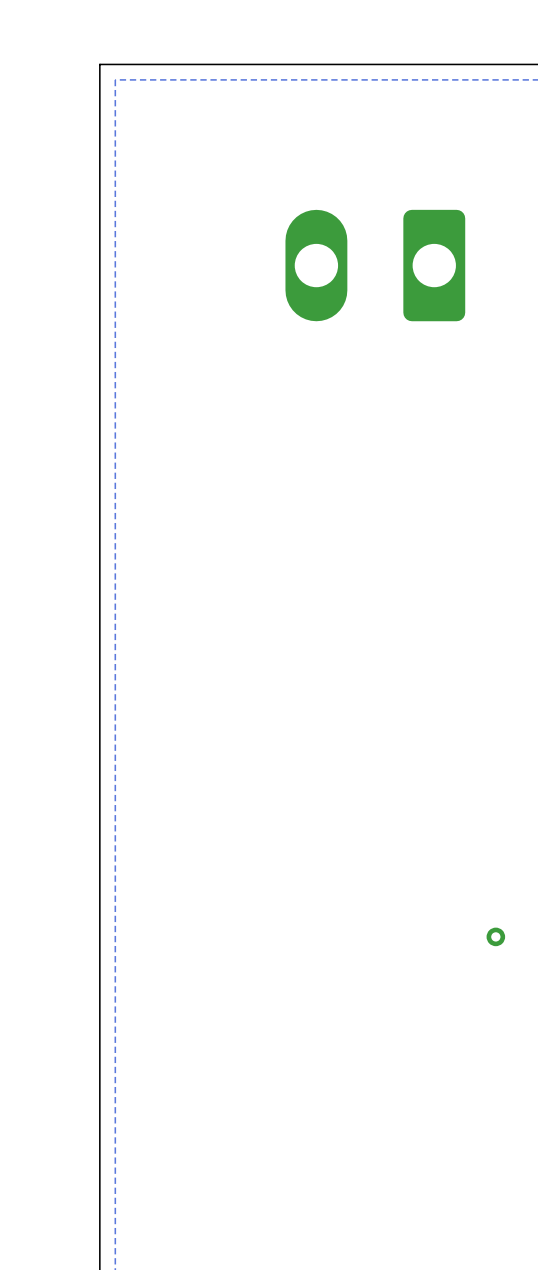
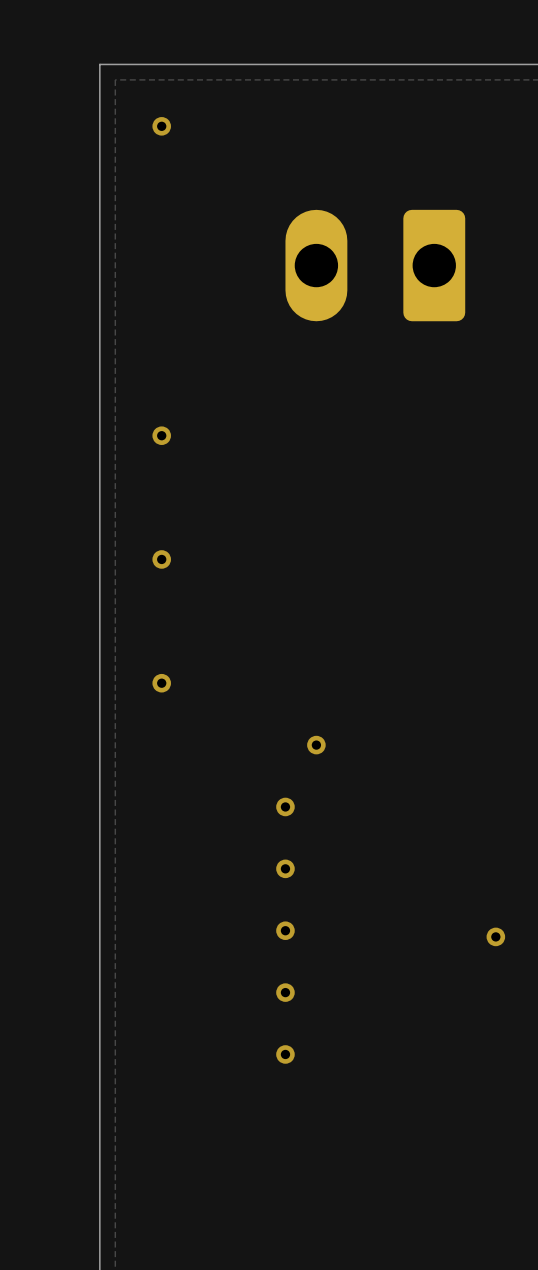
via: none -> (161, 126)
via: none -> (161, 435)
via: none -> (161, 559)
via: none -> (161, 683)
via: none -> (316, 745)
via: none -> (285, 806)
via: none -> (285, 868)
via: none -> (285, 930)
via: none -> (285, 992)
via: none -> (285, 1054)

